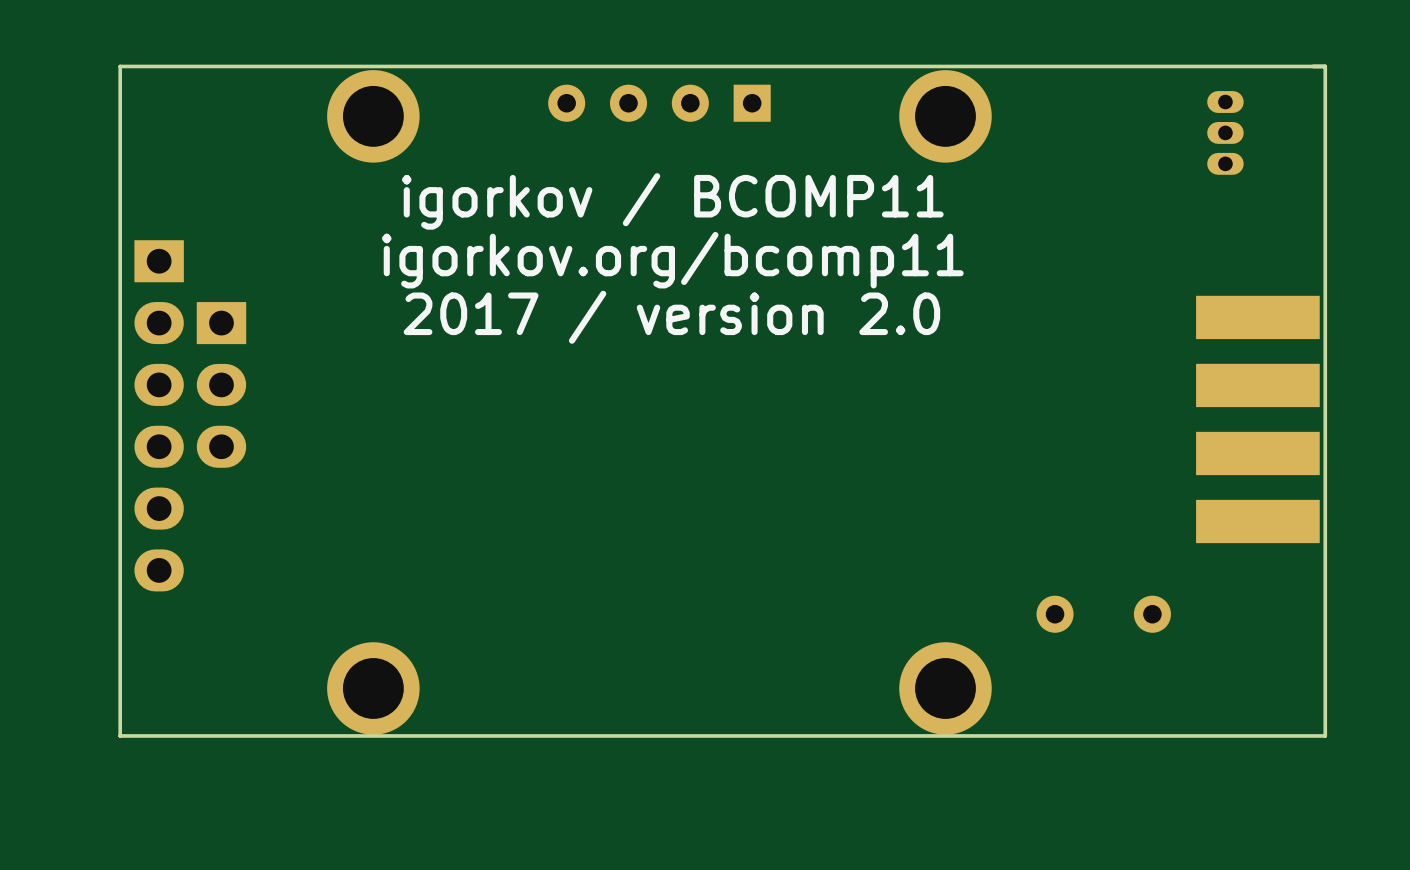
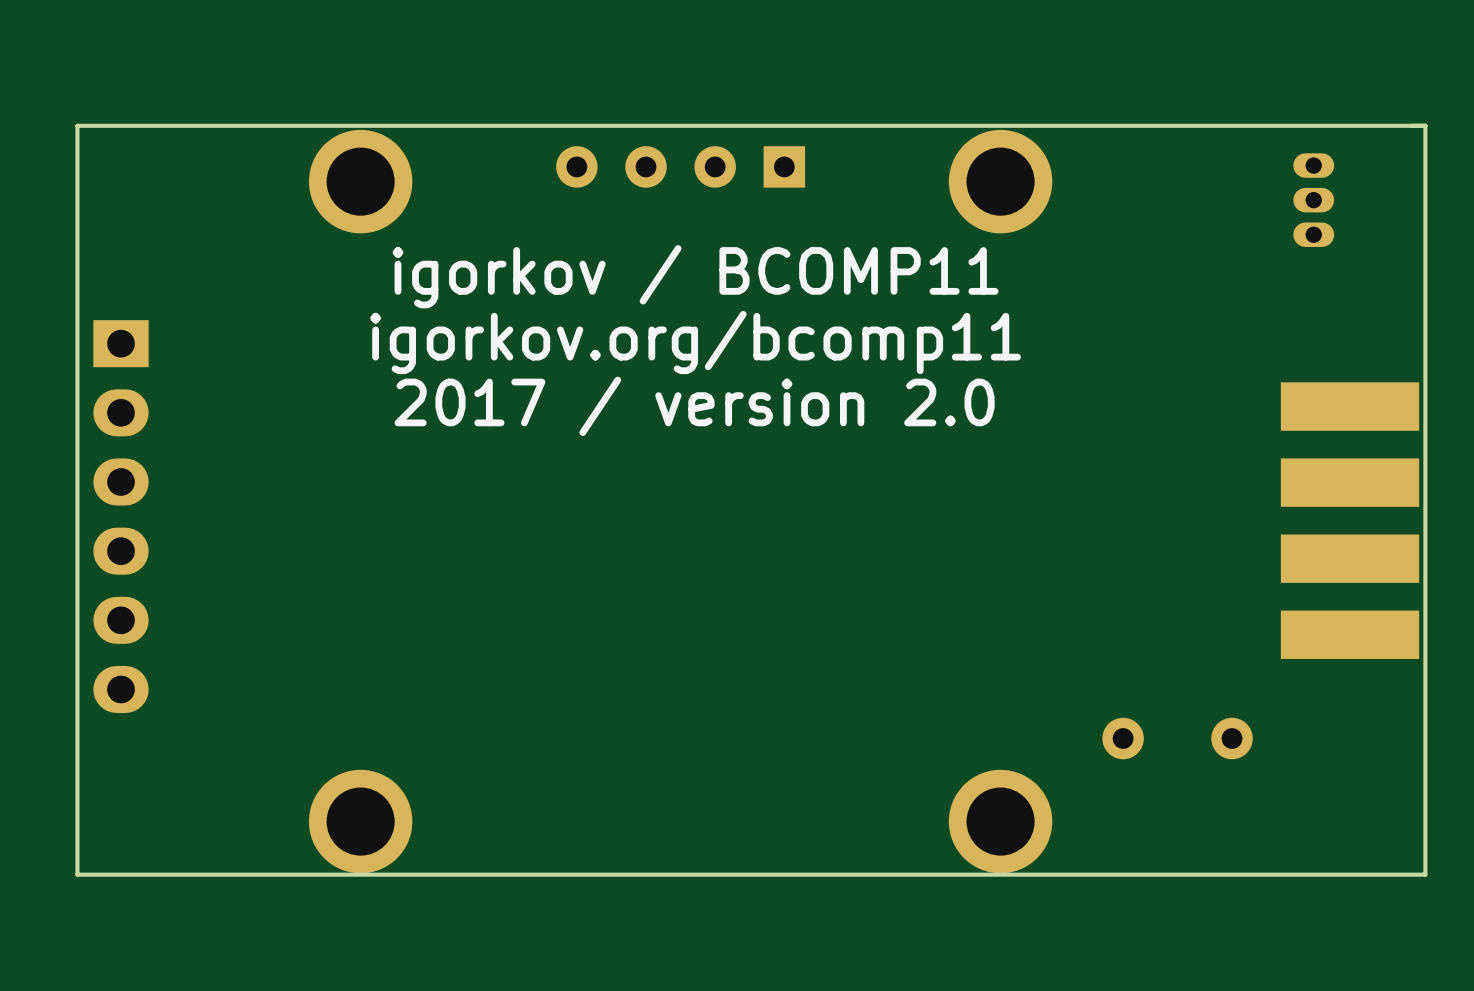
part: (221, 384) -> none

